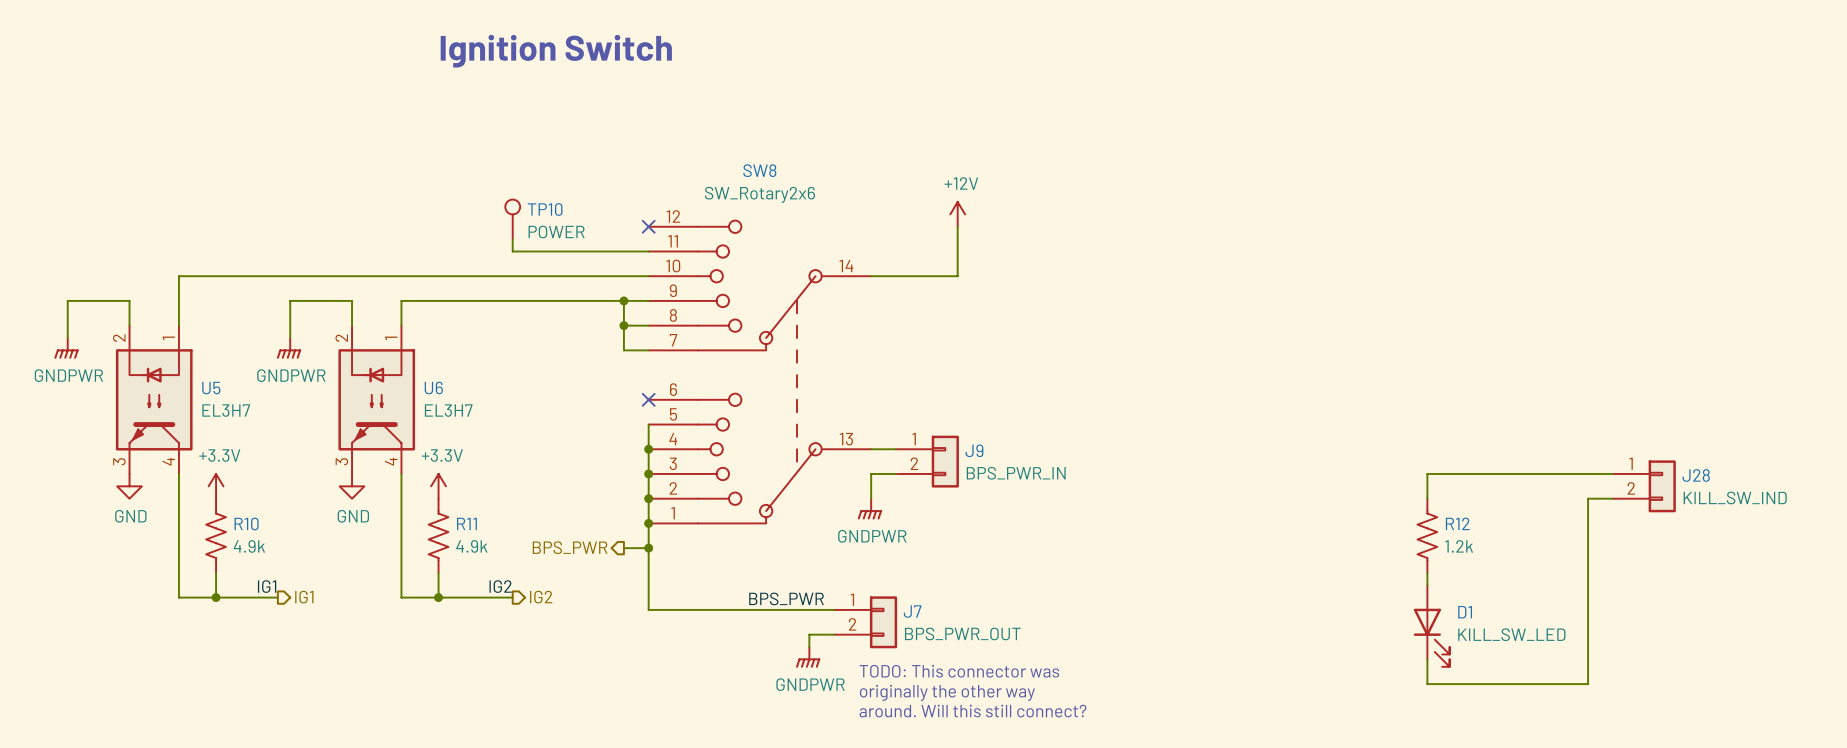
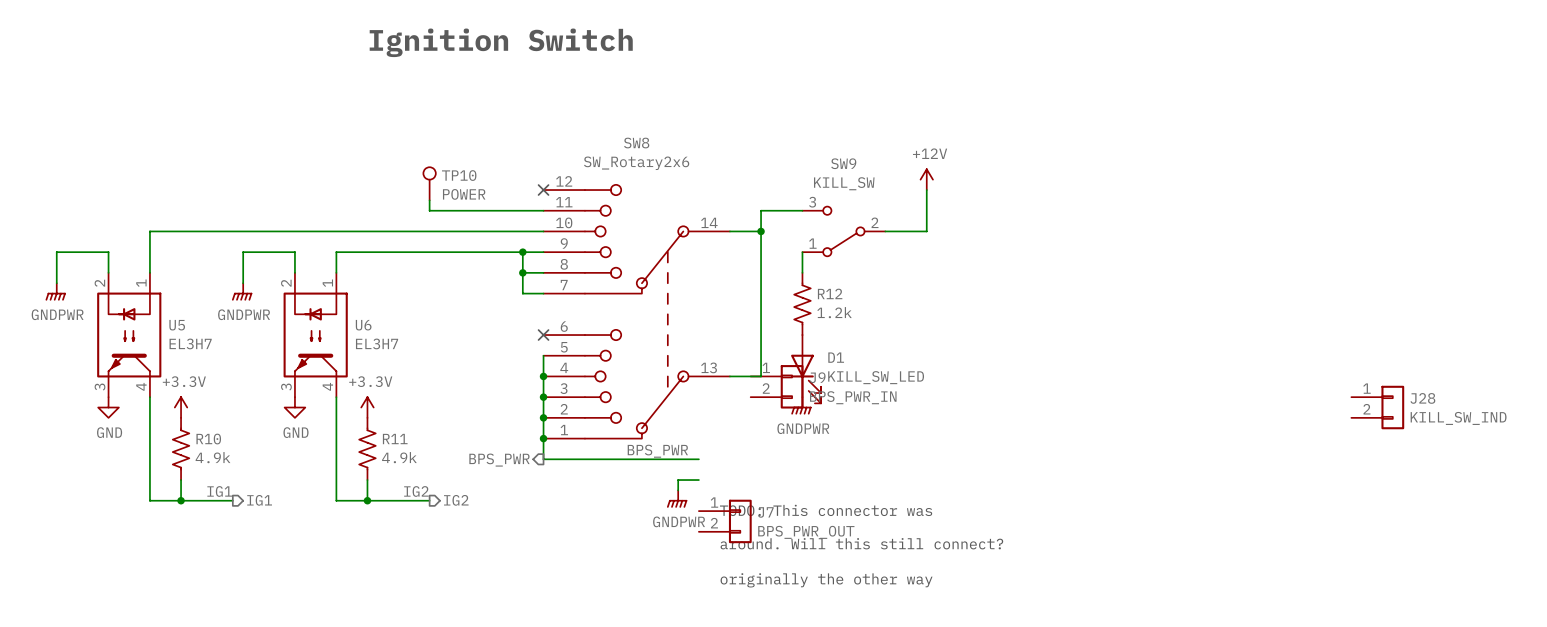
power symbol position: +12V (957, 214) -> +12V (926, 179)
wire: (957, 226) (957, 276) (908, 276) -> (926, 190) (926, 231) (885, 231)
wire: none -> (802, 210) (761, 210) (761, 376) (750, 376)
junction: none -> (761, 231)
SW9: none -> KILL_SW (843, 231)
wire: none -> (802, 252) (802, 272)
wire: (895, 473) (871, 473) (871, 498) -> none
wire: (1612, 473) (1427, 473) (1427, 498) -> none
power symbol: none -> GNDPWR (801, 405)
wire: (1612, 498) (1588, 498) (1588, 684) (1427, 684) (1427, 659) -> none
power symbol: GNDPWR (869, 509) -> none
R12 position: (1427, 535) -> (802, 303)
hierarchical label position: BPS_PWR (570, 547) -> BPS_PWR (499, 460)
wire: (623, 548) (648, 548) (648, 609) (834, 609) -> none
wire: none -> (543, 459) (698, 459)
junction: (648, 548) -> none
wire: (1427, 572) (1427, 585) -> none
power symbol: none -> GNDPWR (677, 499)
label position: BPS_PWR (786, 598) -> BPS_PWR (657, 451)
D1 position: (1431, 626) -> (806, 369)
wire: (834, 634) (809, 634) (809, 647) -> (698, 480) (678, 480) (678, 490)
power symbol: GNDPWR (808, 657) -> none
text position: TODO: This connector was (959, 671) -> TODO: This connector was (826, 510)
text position: around. Will this still connect? (973, 711) -> around. Will this still connect? (861, 543)

